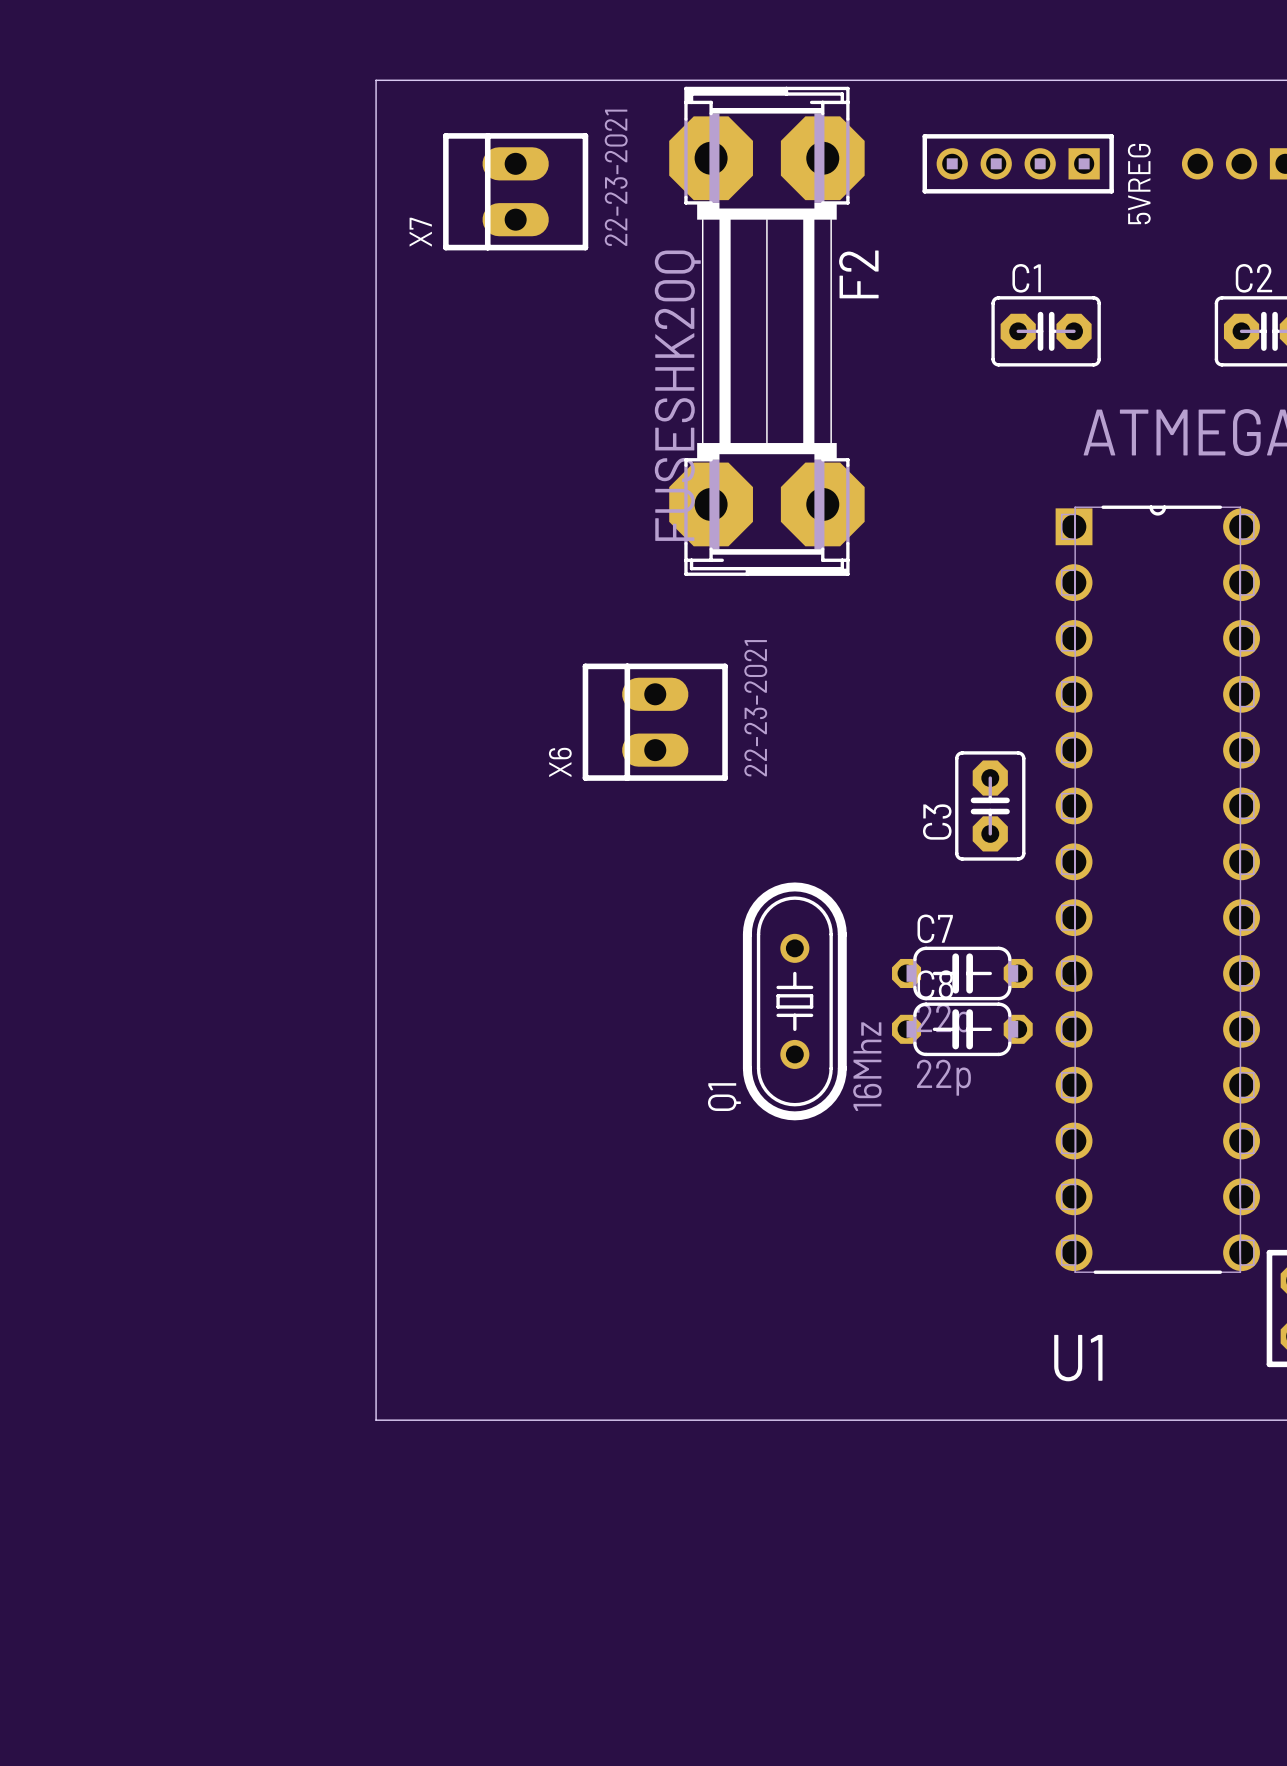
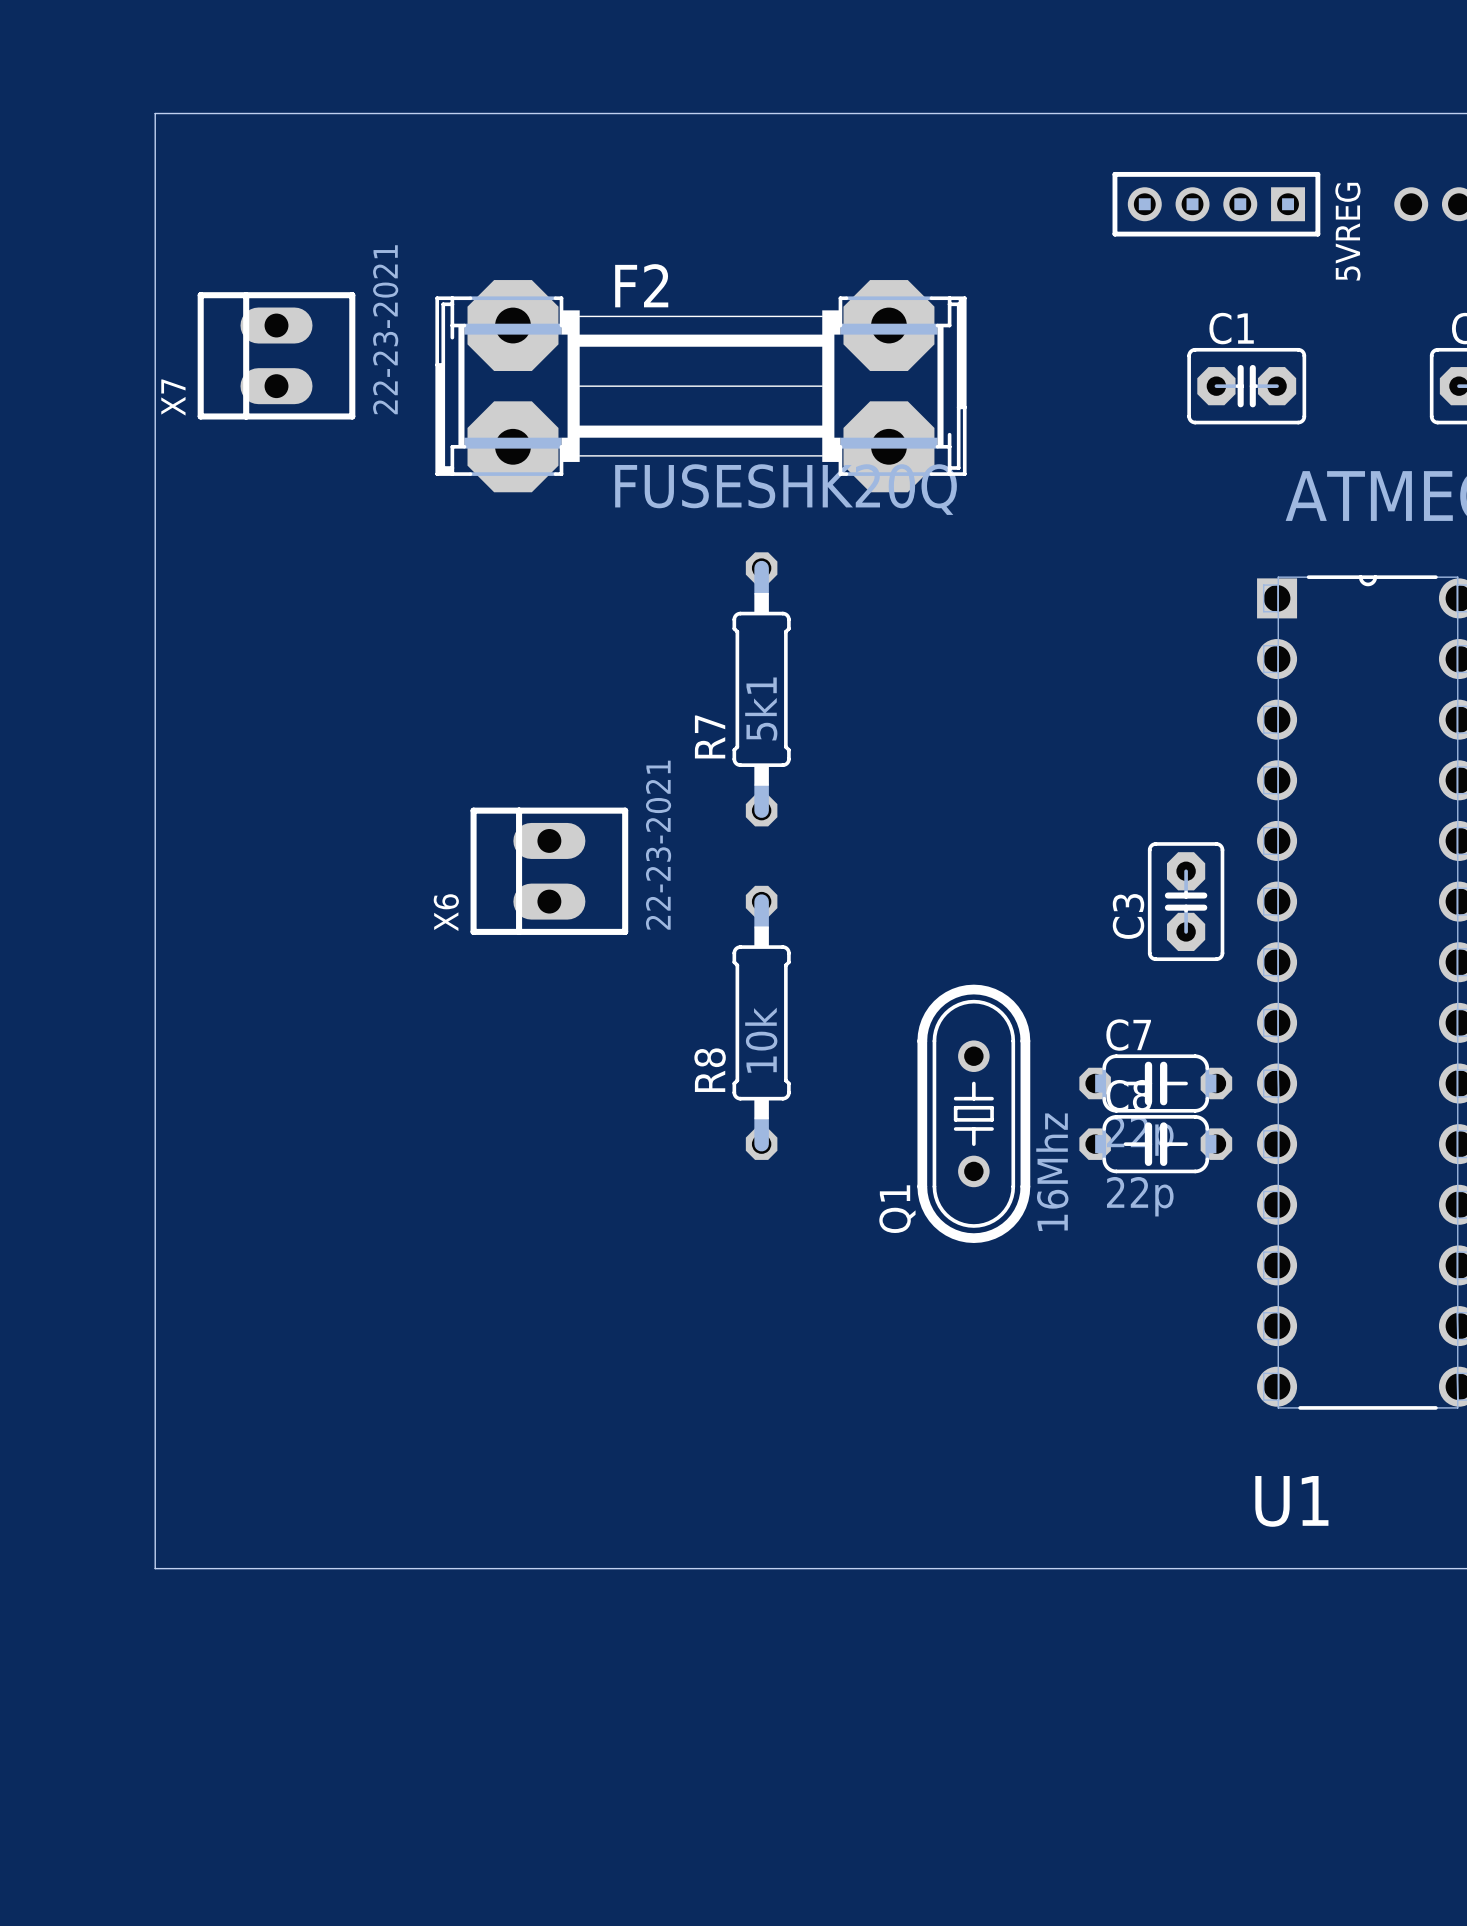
board edge: (376, 80) (376, 1420) -> (519, 113) (155, 113) (155, 1568) (519, 1568)
X7 position: (515, 191) -> (276, 355)
F2 rotation: 0° (766, 331) -> 90° counterclockwise (700, 386)
R7: none -> 5k1 (761, 689)
X6 position: (655, 722) -> (549, 871)
R8: none -> 10k (761, 1022)

